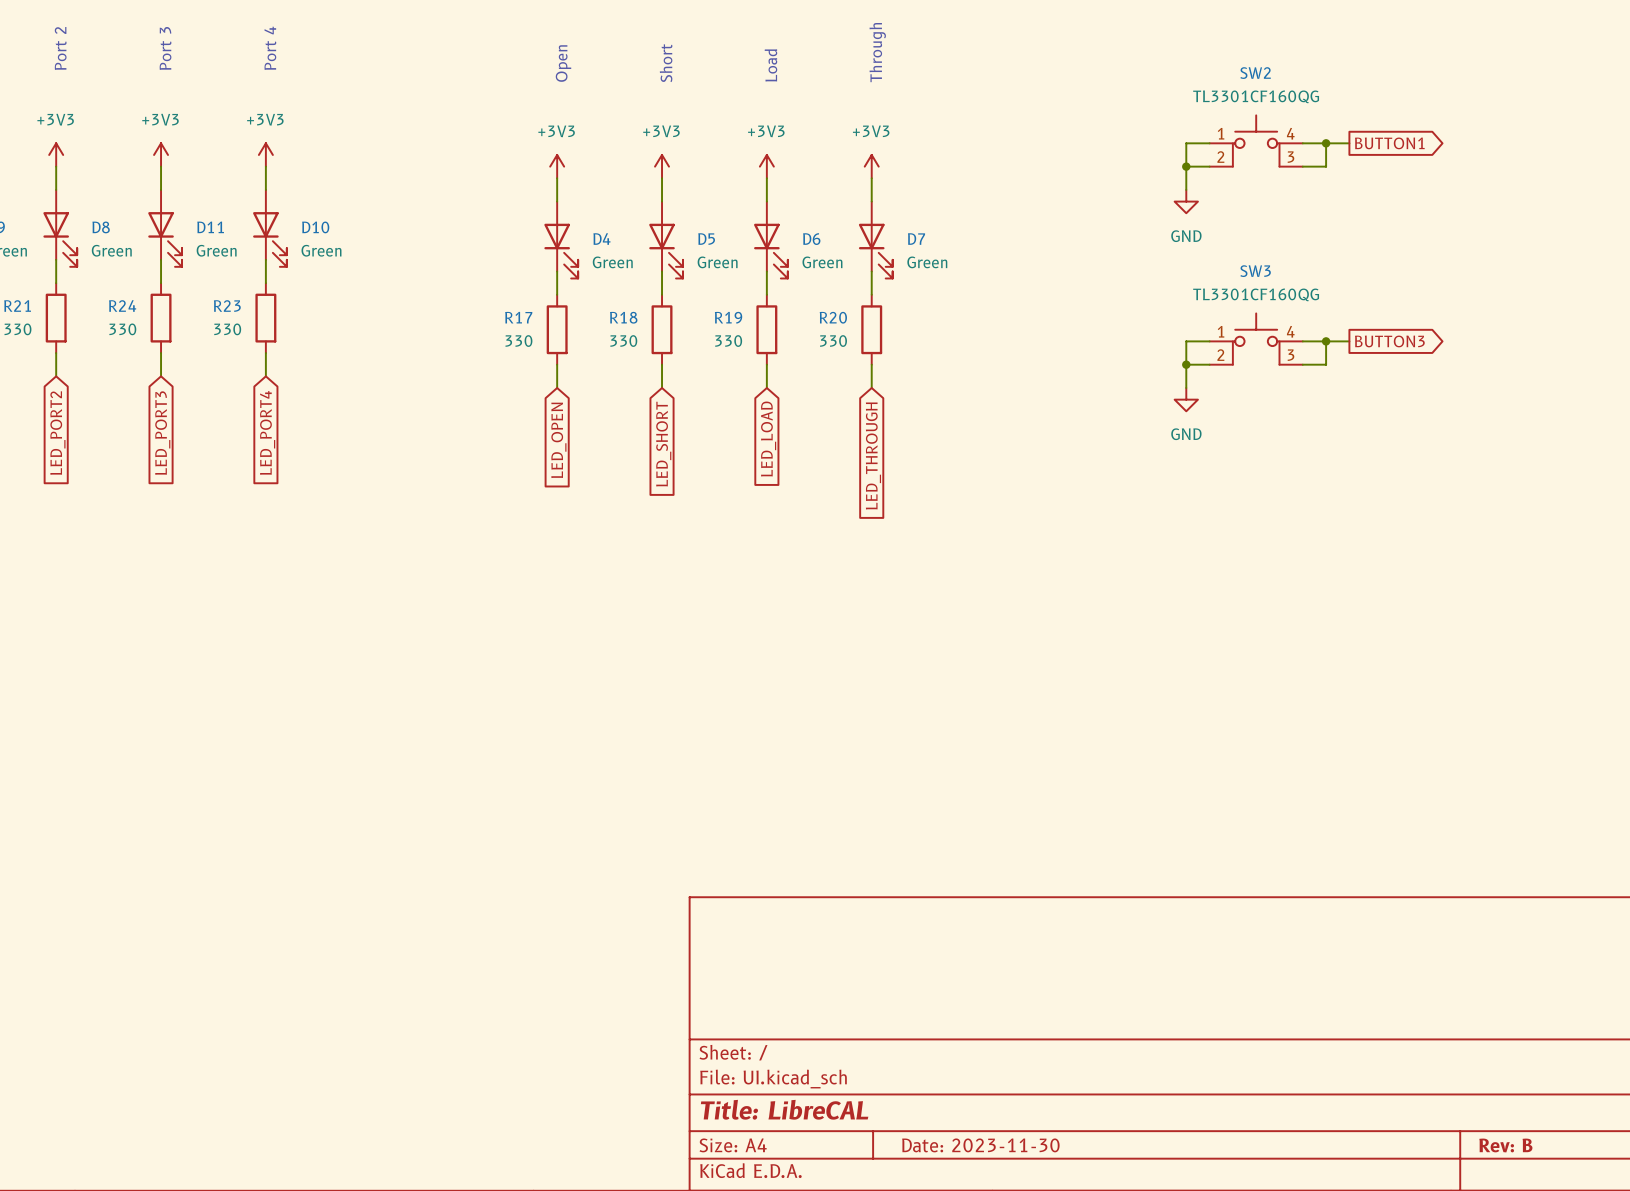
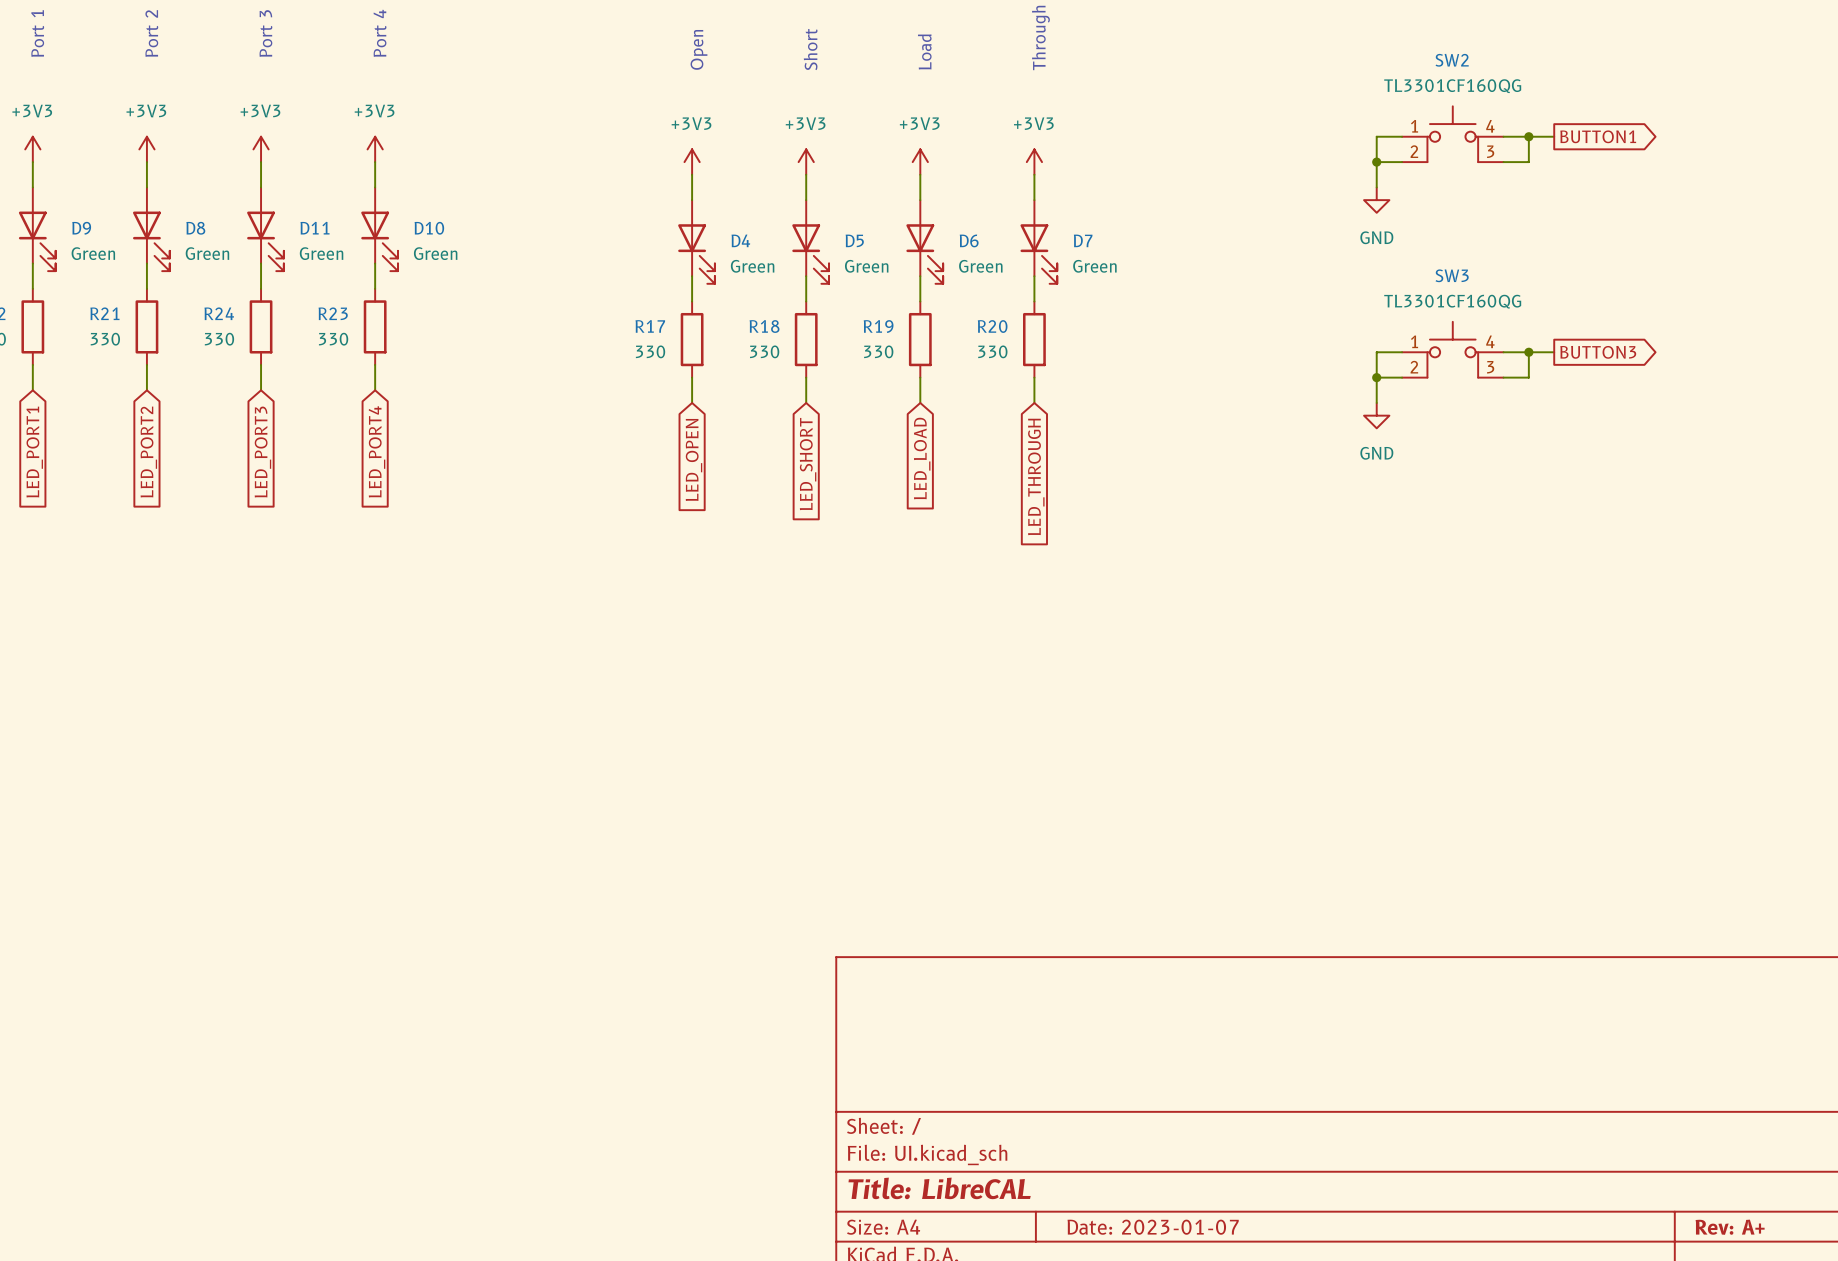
title block: Date: 2023-11-30 (980, 1145) -> Date: 2023-01-07 (1153, 1227)
title block: Rev: B (1505, 1145) -> Rev: A+ (1730, 1227)

